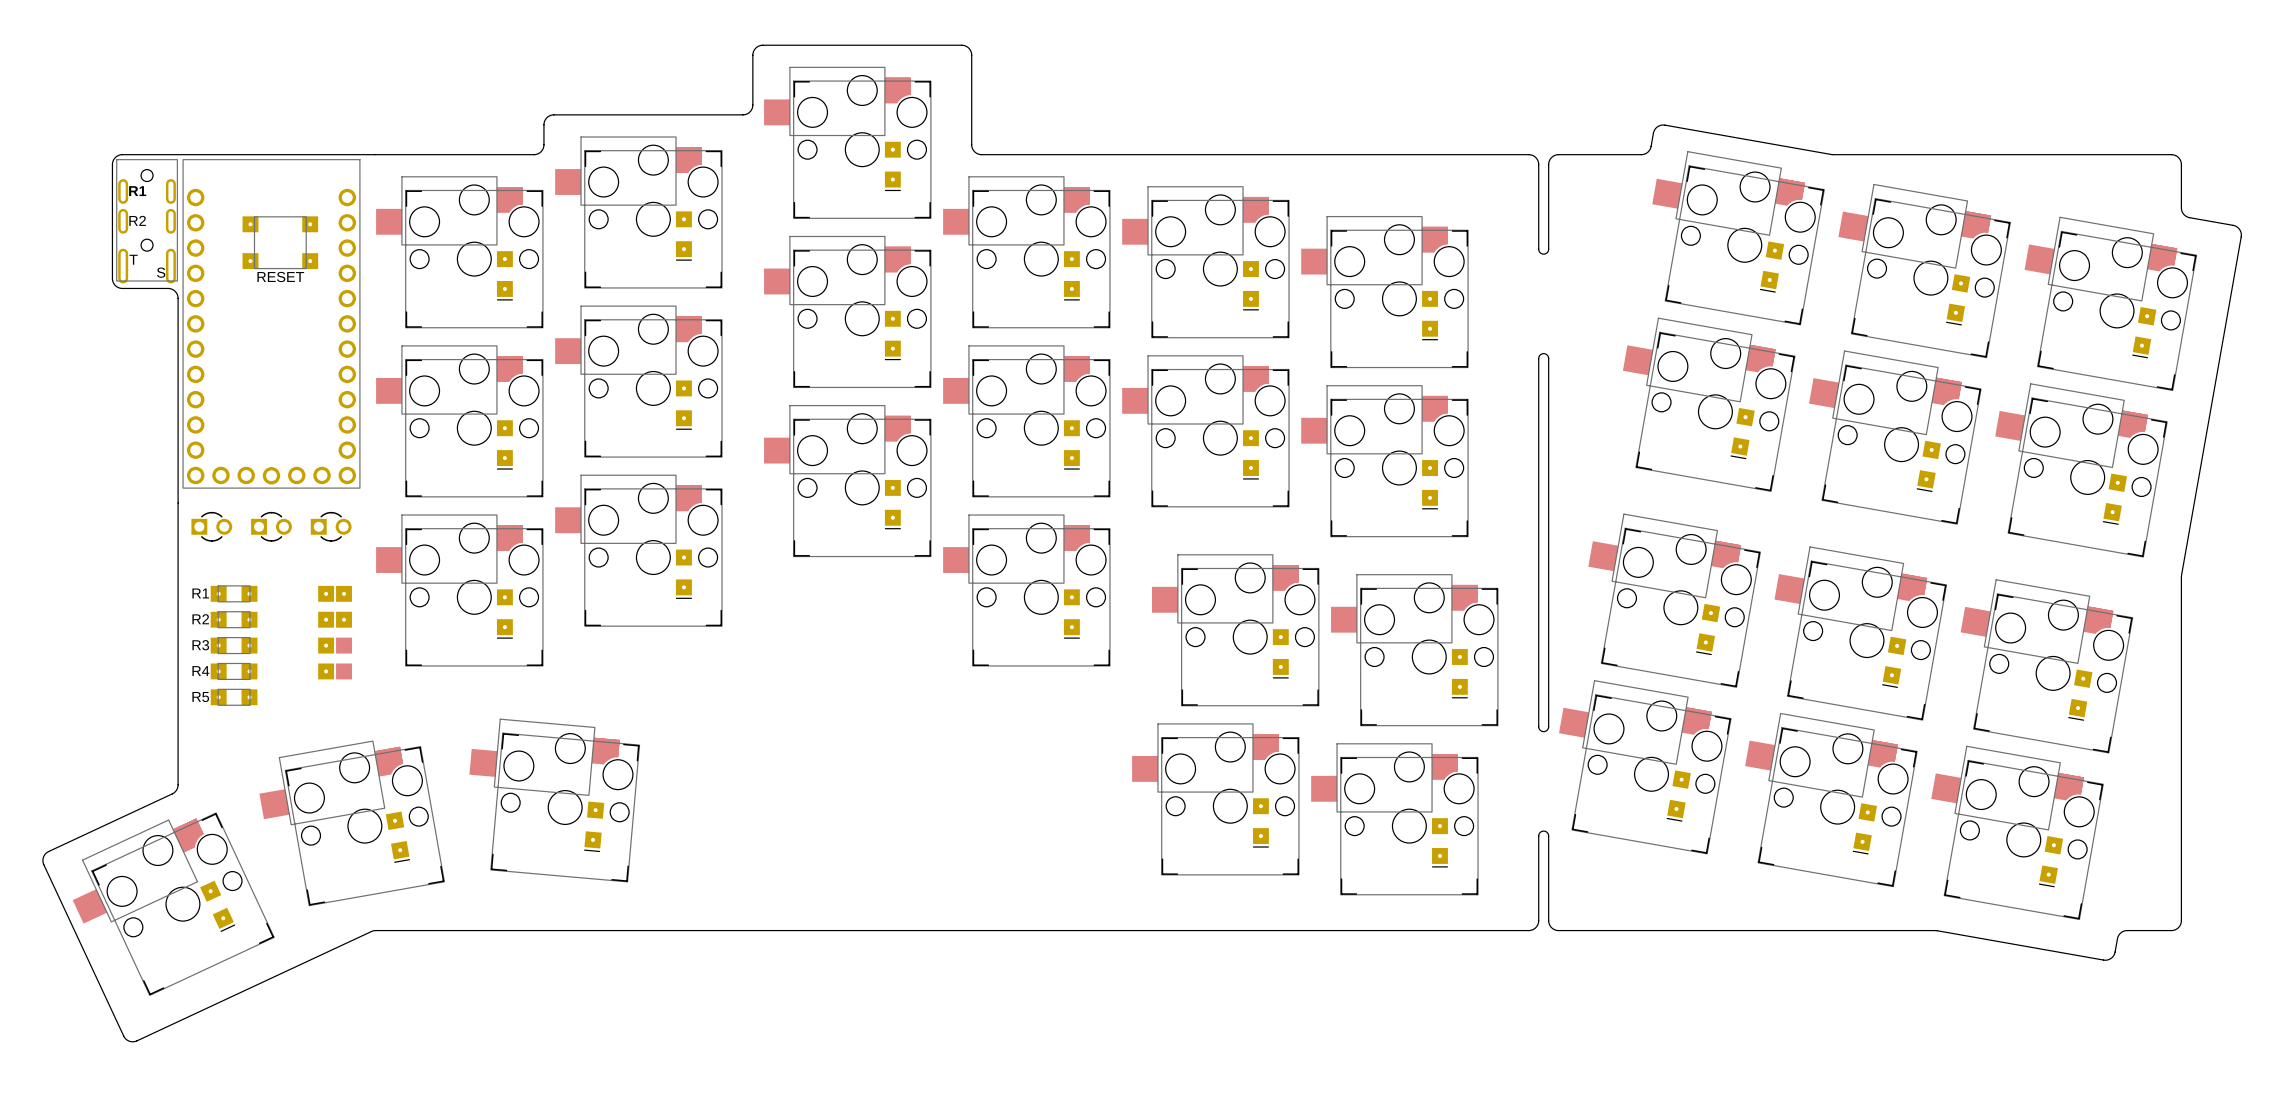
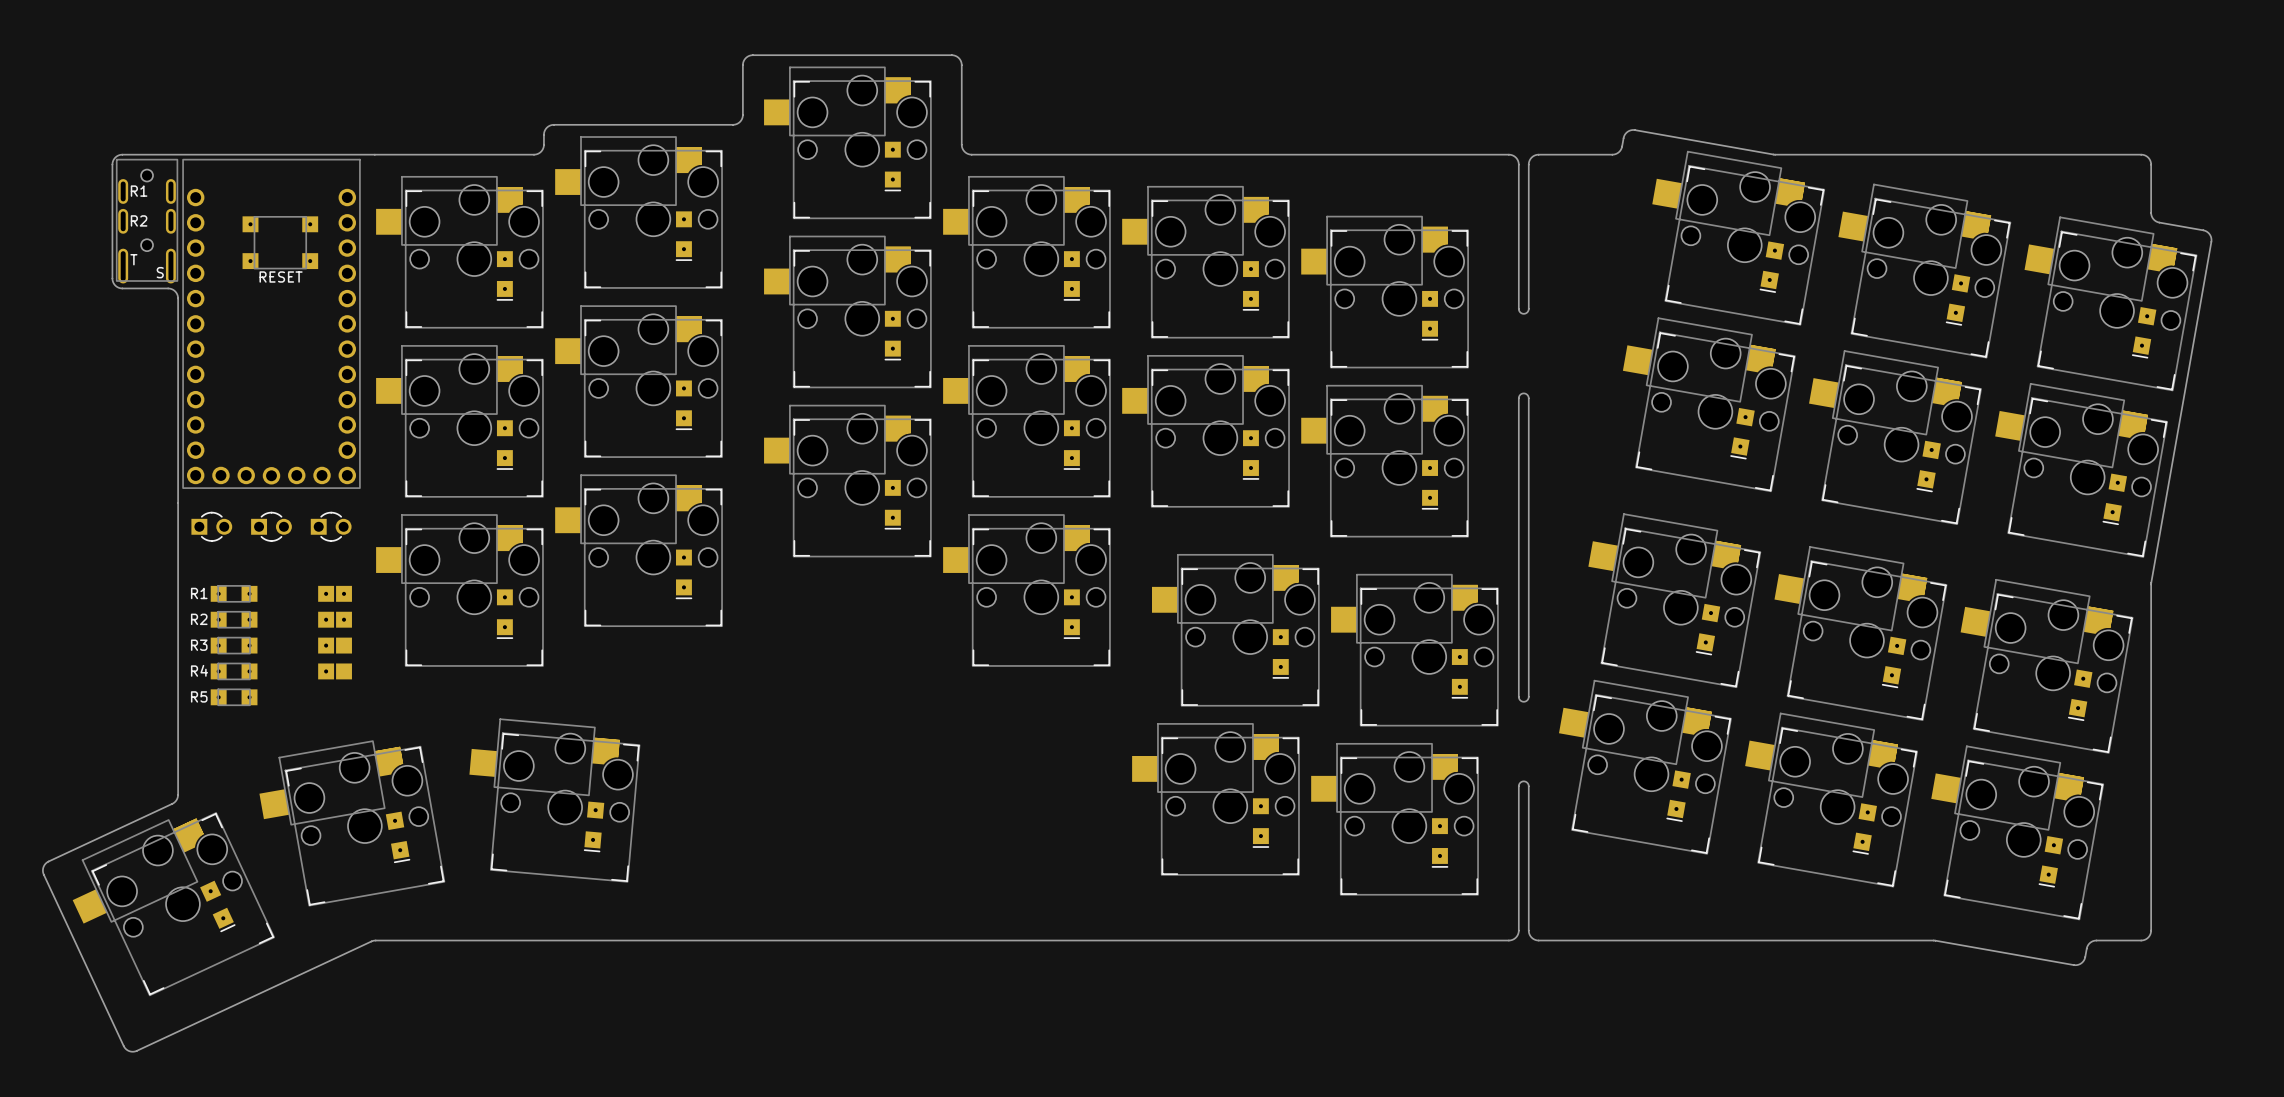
board edge: (543, 134) (544, 120) (552, 114) (746, 114) (750, 111) (752, 106) (753, 52) (755, 48) (760, 45) (961, 45) (968, 48) (971, 54) (971, 146) (975, 152) (981, 154) -> (543, 134) (546, 127) (553, 124) (736, 124) (740, 121) (742, 115) (743, 62) (745, 58) (750, 55) (951, 55) (958, 57) (961, 64) (962, 148) (968, 154) (981, 154)
board edge: (1508, 154) (1530, 154) (1538, 161) (1538, 249) (1543, 254) (1548, 249) (1548, 163) (1552, 156) (1558, 154) -> (1508, 154) (1515, 157) (1518, 163) (1518, 308) (1523, 313) (1528, 308) (1529, 162) (1531, 157) (1536, 154) (1558, 154)
board edge: (1612, 154) (1646, 153) (1650, 147) (1654, 130) (1662, 125) (1833, 154) -> (1612, 154) (1620, 150) (1624, 135) (1632, 129) (1774, 154) (1833, 154)
board edge: (2141, 154) (2172, 154) (2177, 156) (2181, 163) (2181, 207) (2183, 214) (2189, 217) (2234, 225) (2239, 229) (2241, 235) (2181, 576) (2181, 921) (2178, 927) (2172, 930) (2122, 931) (2118, 936) (2114, 955) (2108, 959) (1936, 930) (1556, 930) (1551, 927) (1548, 921) (1548, 836) (1543, 831) (1538, 836) (1538, 921) (1535, 927) (1529, 930) (374, 930) (136, 1040) (130, 1041) (123, 1036) (43, 864) (43, 858) (48, 851) (173, 793) (178, 784) -> (2141, 154) (2147, 156) (2150, 162) (2151, 212) (2153, 219) (2159, 222) (2204, 230) (2209, 234) (2211, 240) (2151, 583) (2151, 931) (2148, 937) (2142, 940) (2092, 941) (2087, 946) (2084, 960) (2078, 964) (1934, 940) (1535, 939) (1530, 936) (1528, 931) (1528, 786) (1523, 781) (1518, 786) (1518, 931) (1515, 937) (1511, 940) (374, 940) (131, 1051) (123, 1046) (42, 869) (48, 861) (173, 803) (177, 797) (178, 784)
board edge: (1538, 358) (1538, 726) (1543, 731) (1548, 726) (1548, 358) (1543, 353) (1538, 358) -> none
board edge: none -> (1518, 398) (1518, 696) (1523, 701) (1528, 696) (1528, 398) (1523, 393) (1518, 398)

